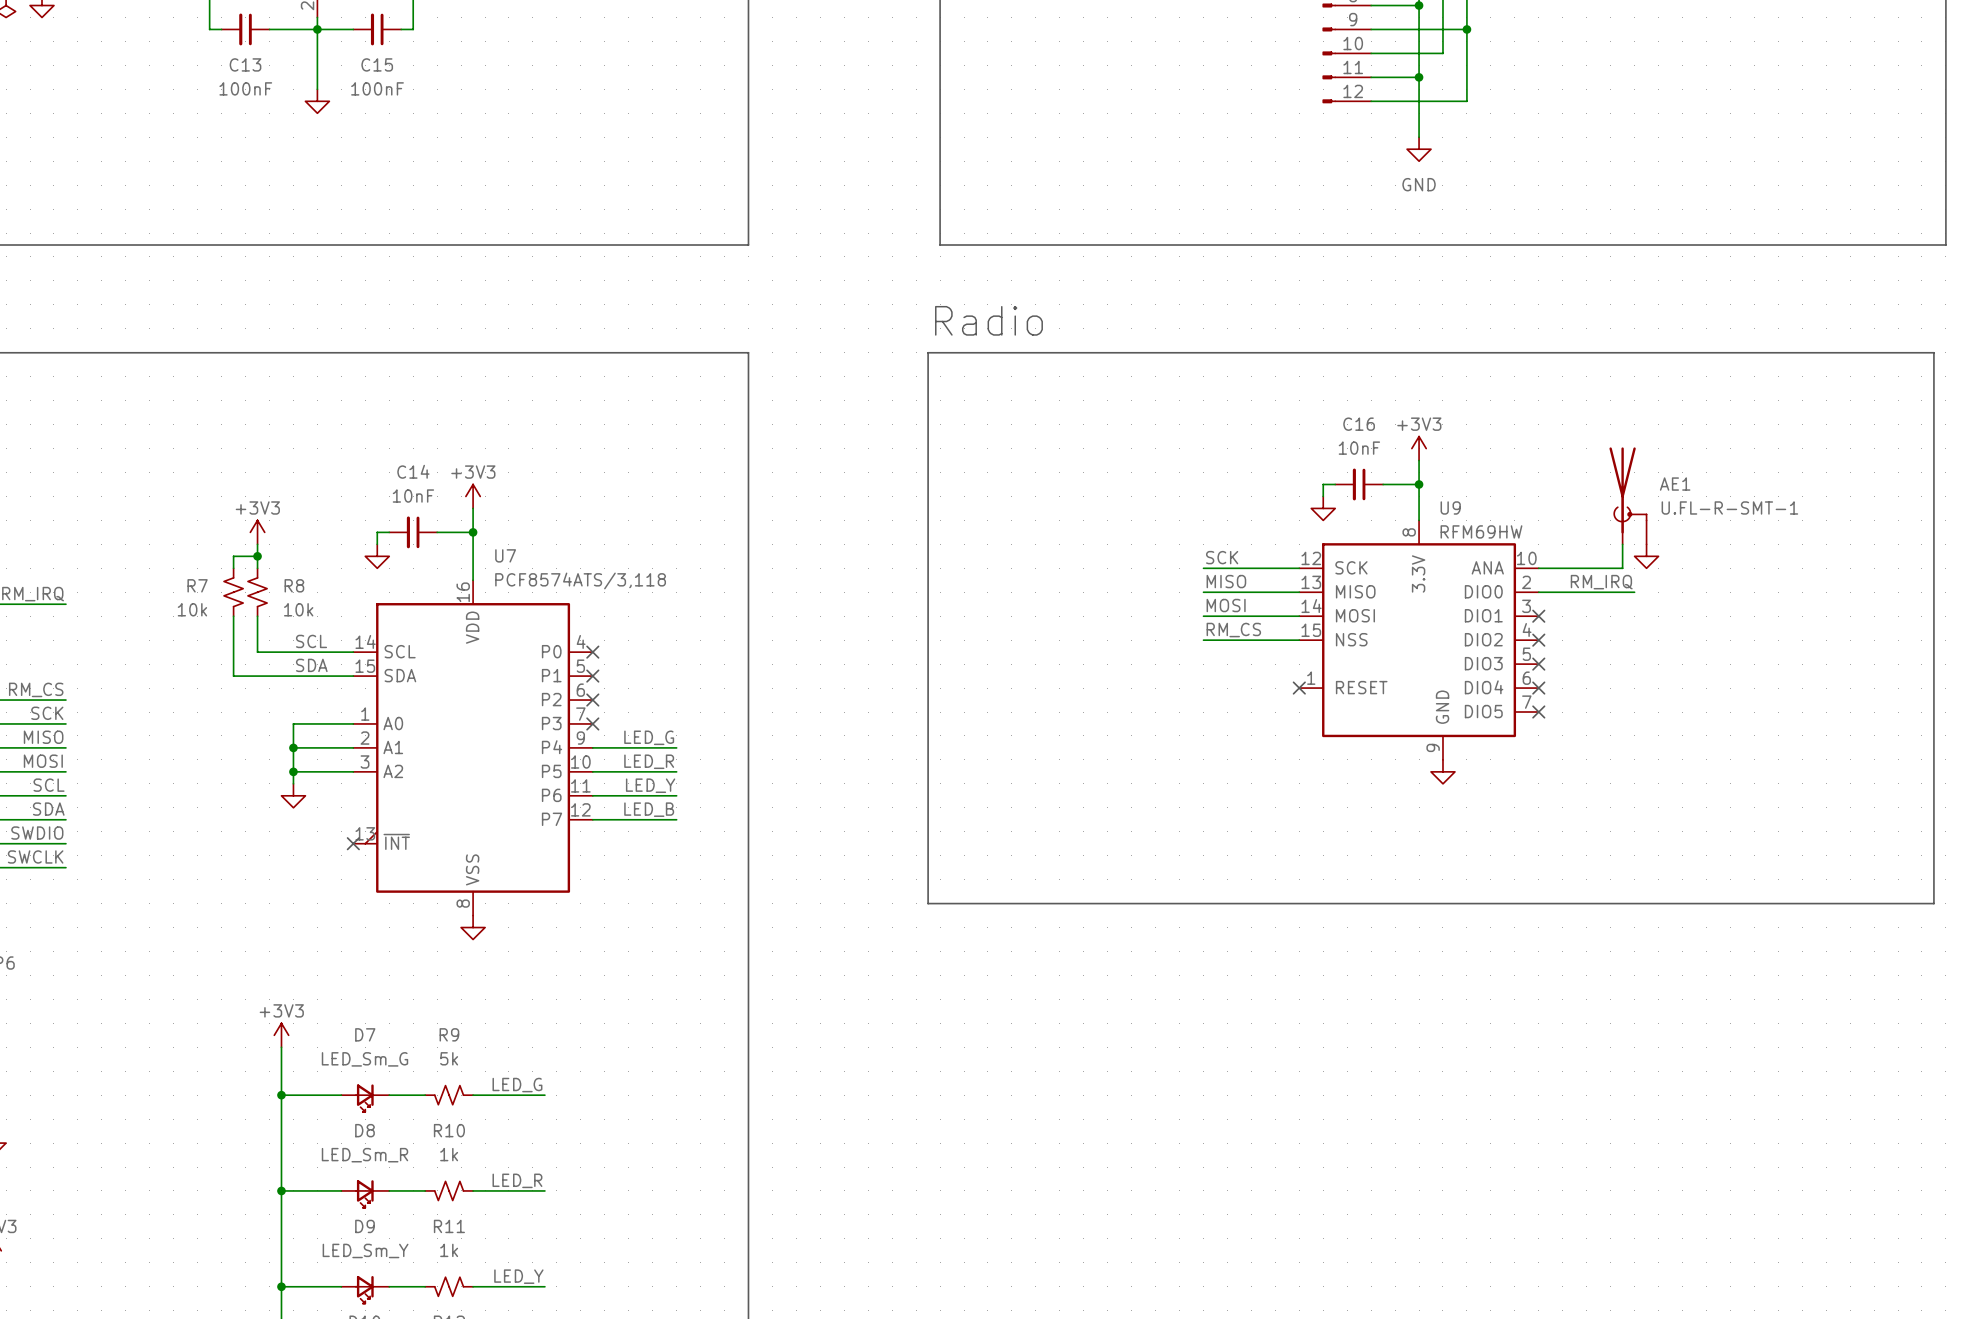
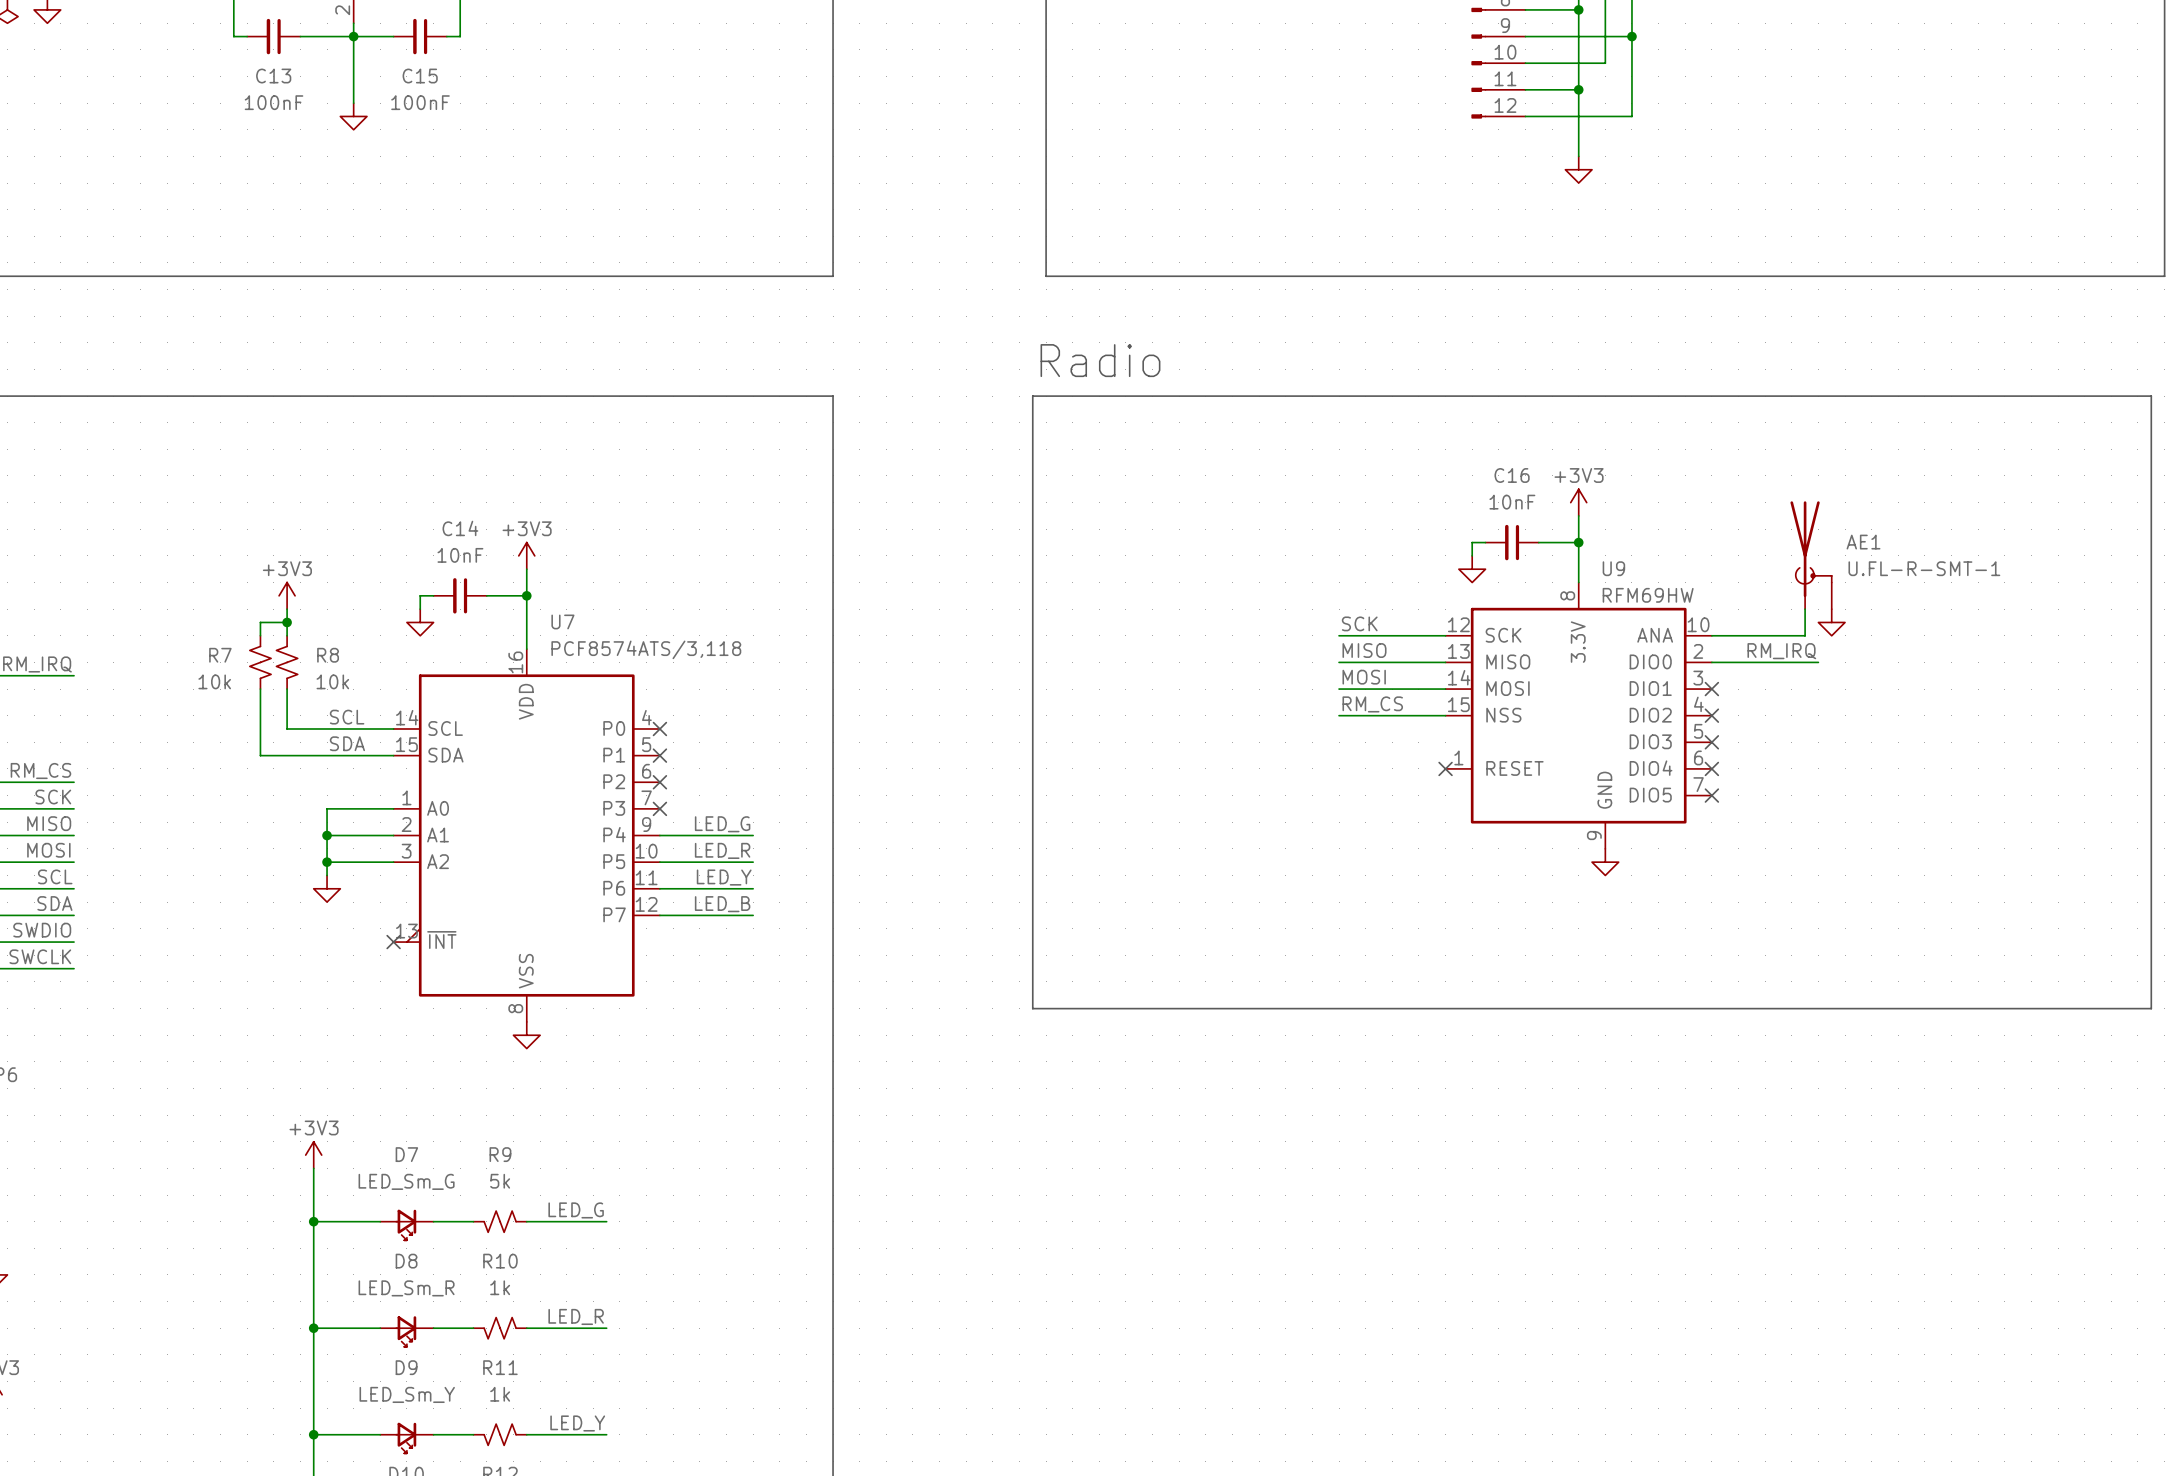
power symbol text: GND (1419, 184) -> none

